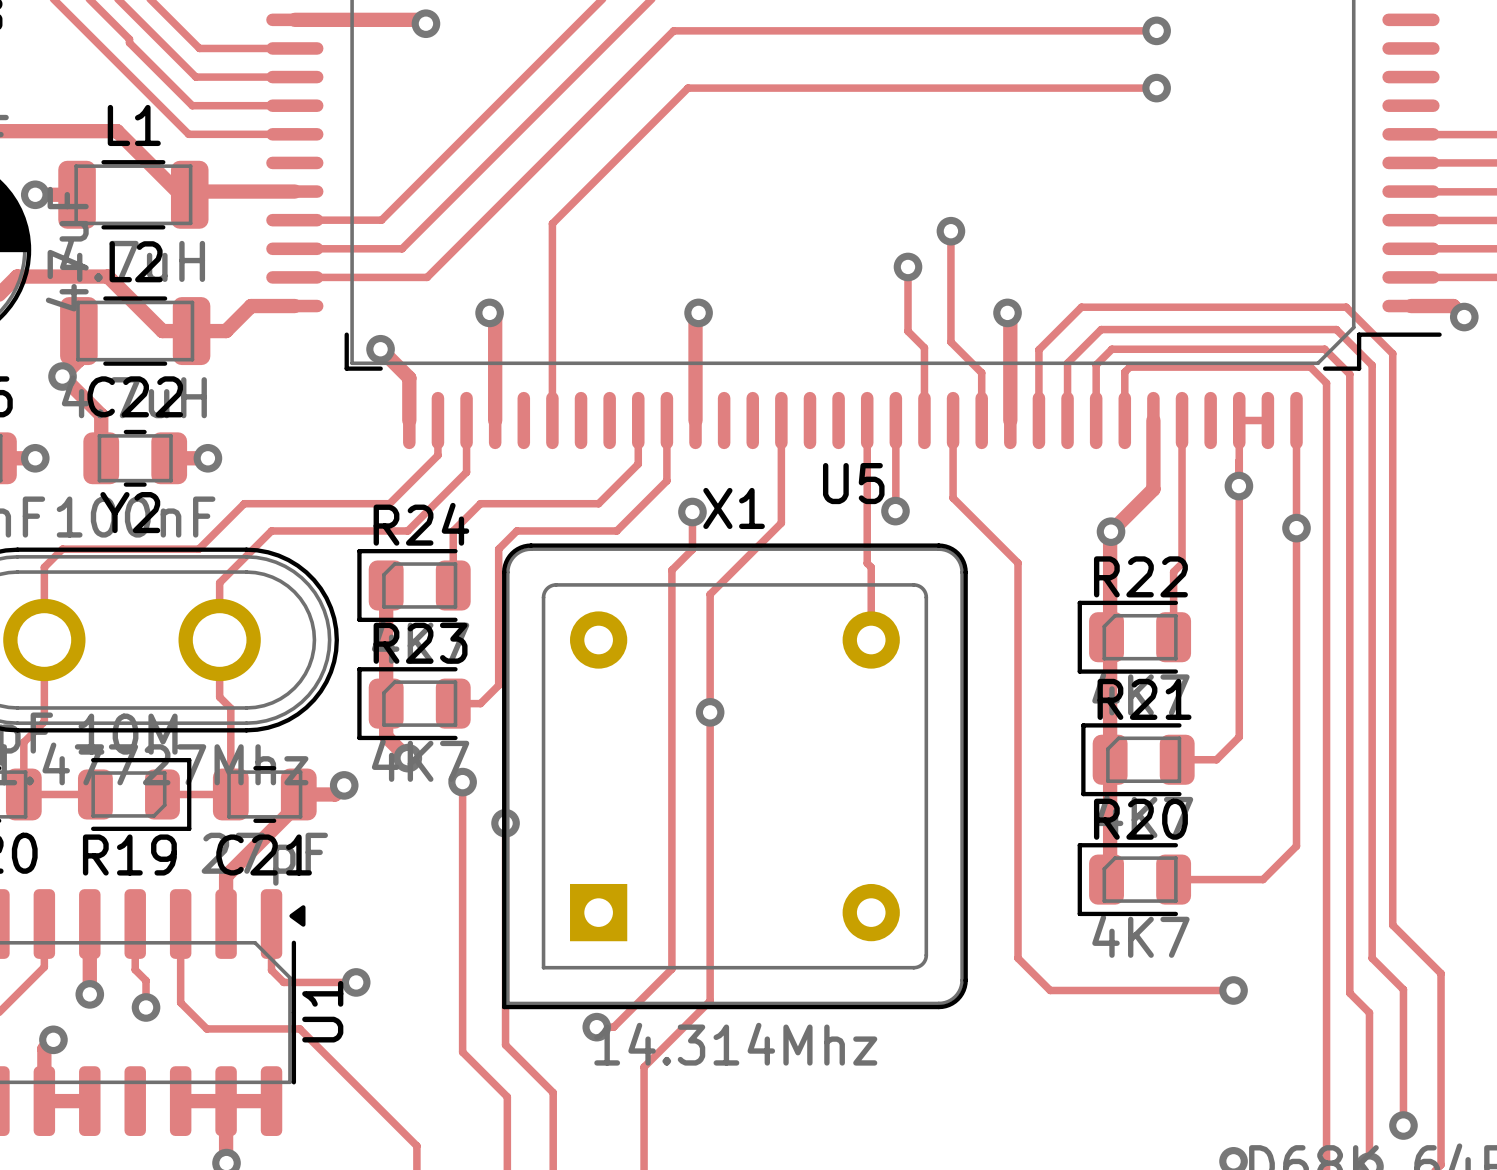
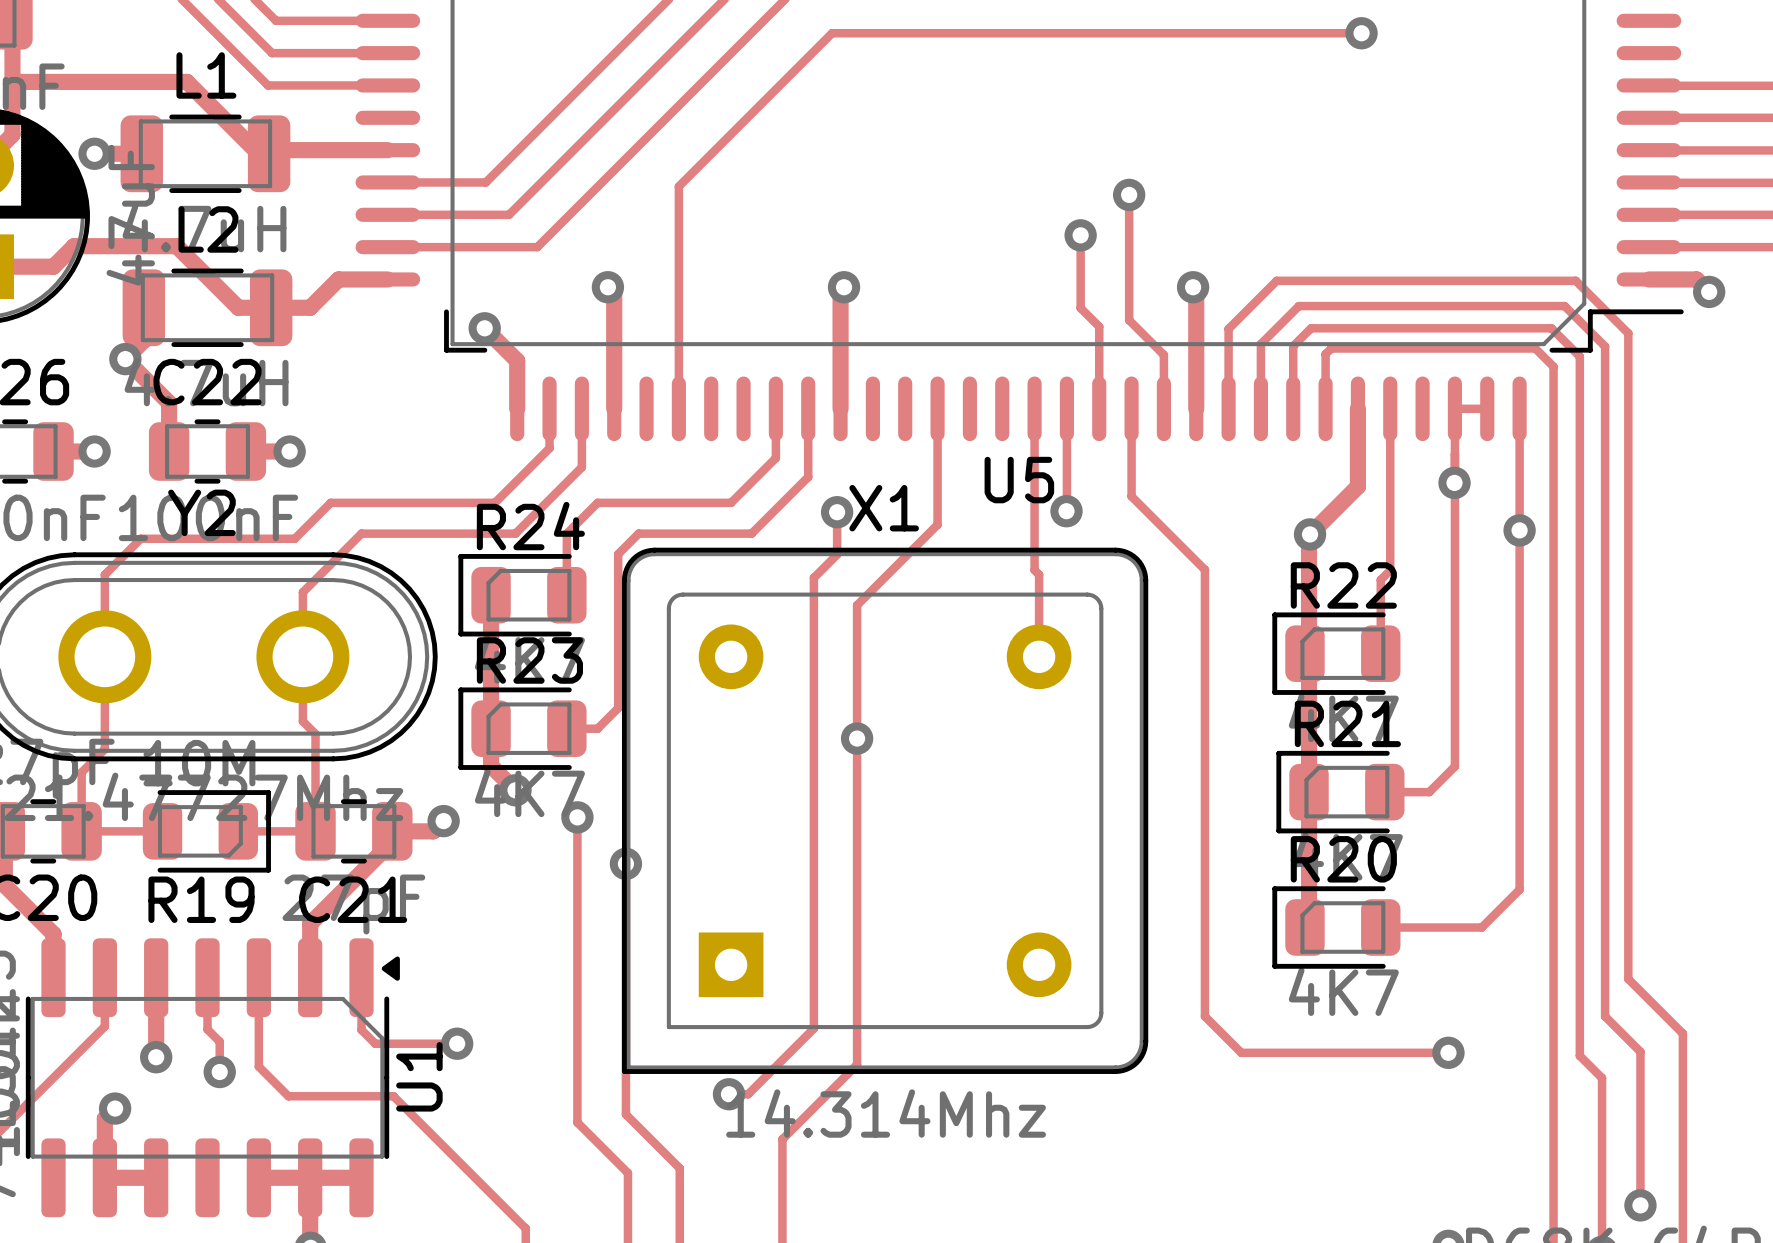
track: (212, 535) (198, 549) (62, 549) -> (294, 538) (140, 538) (125, 554)

